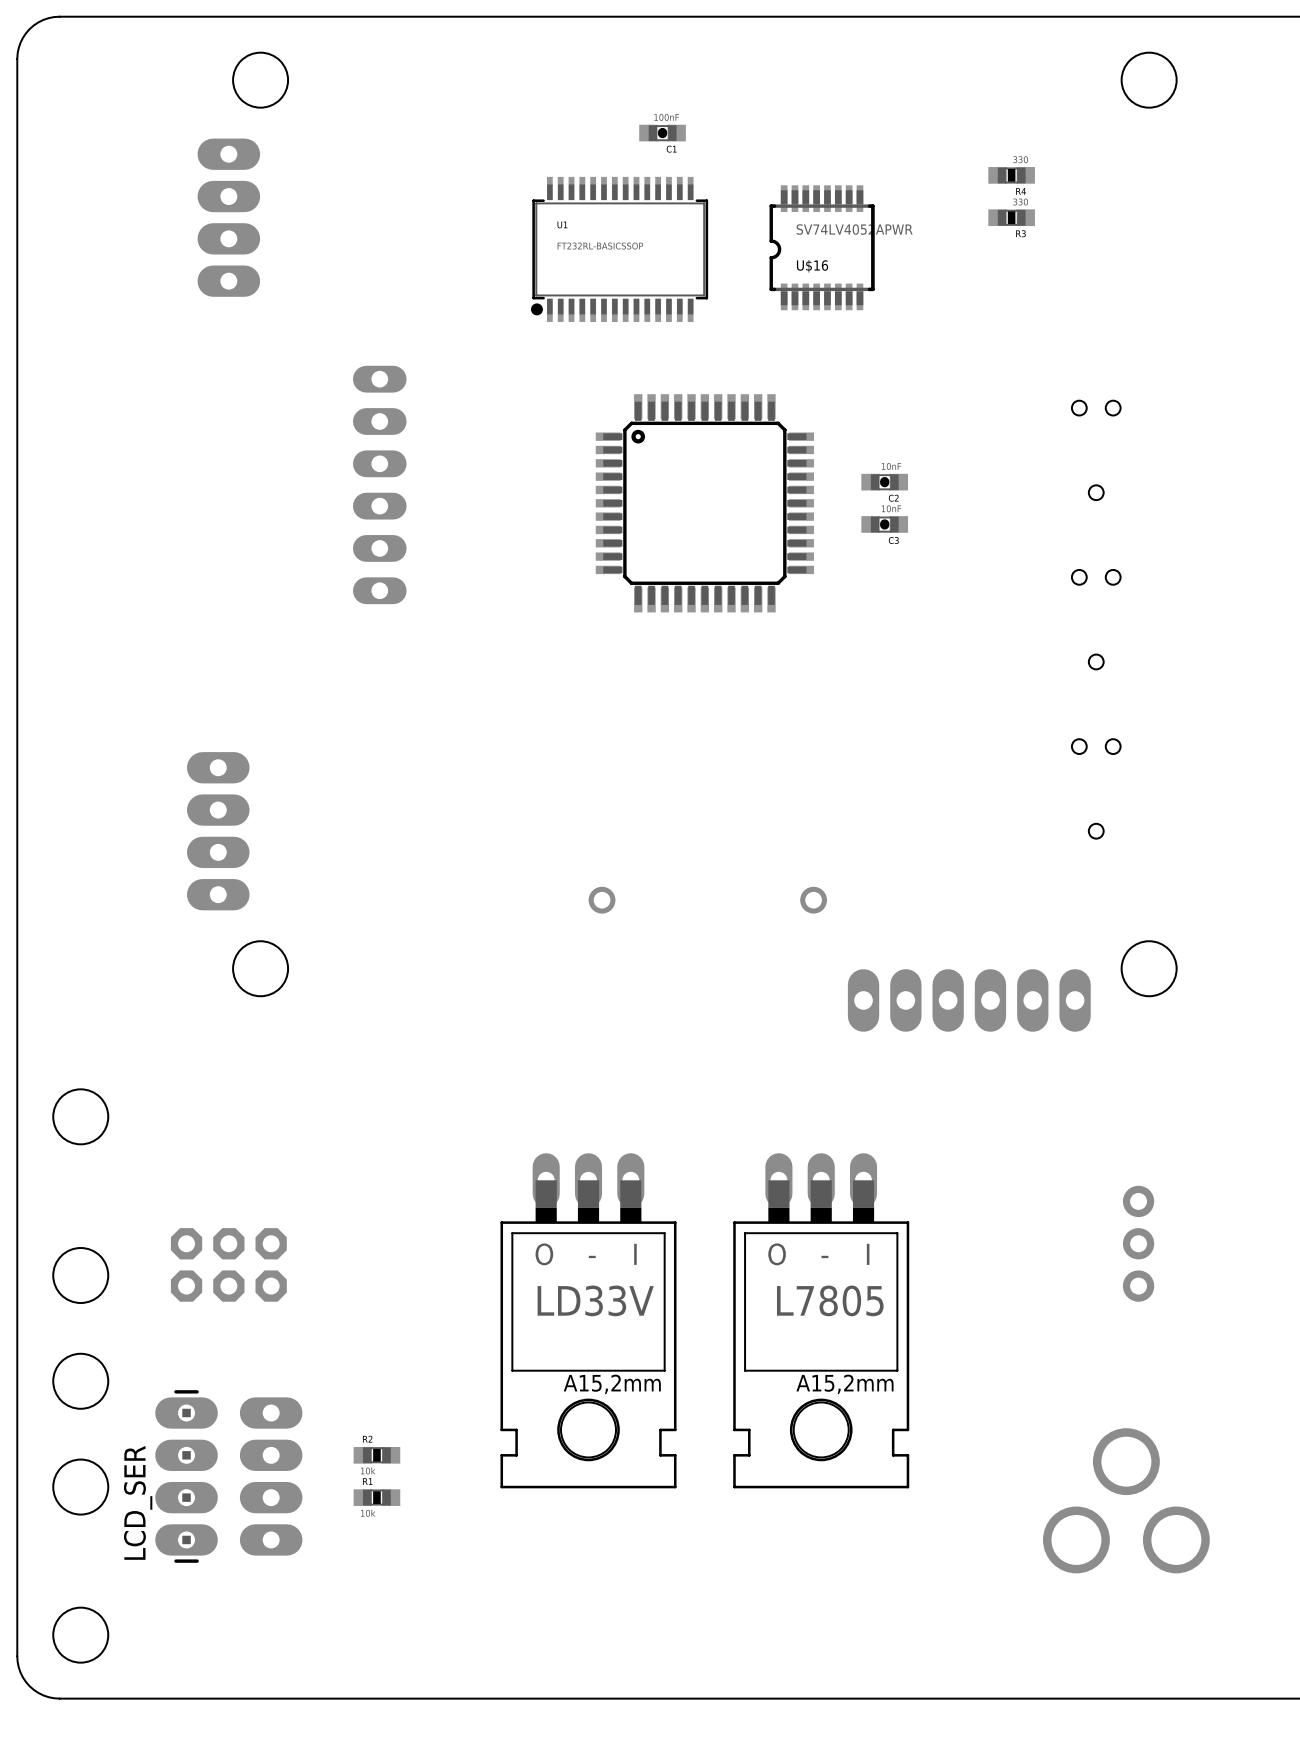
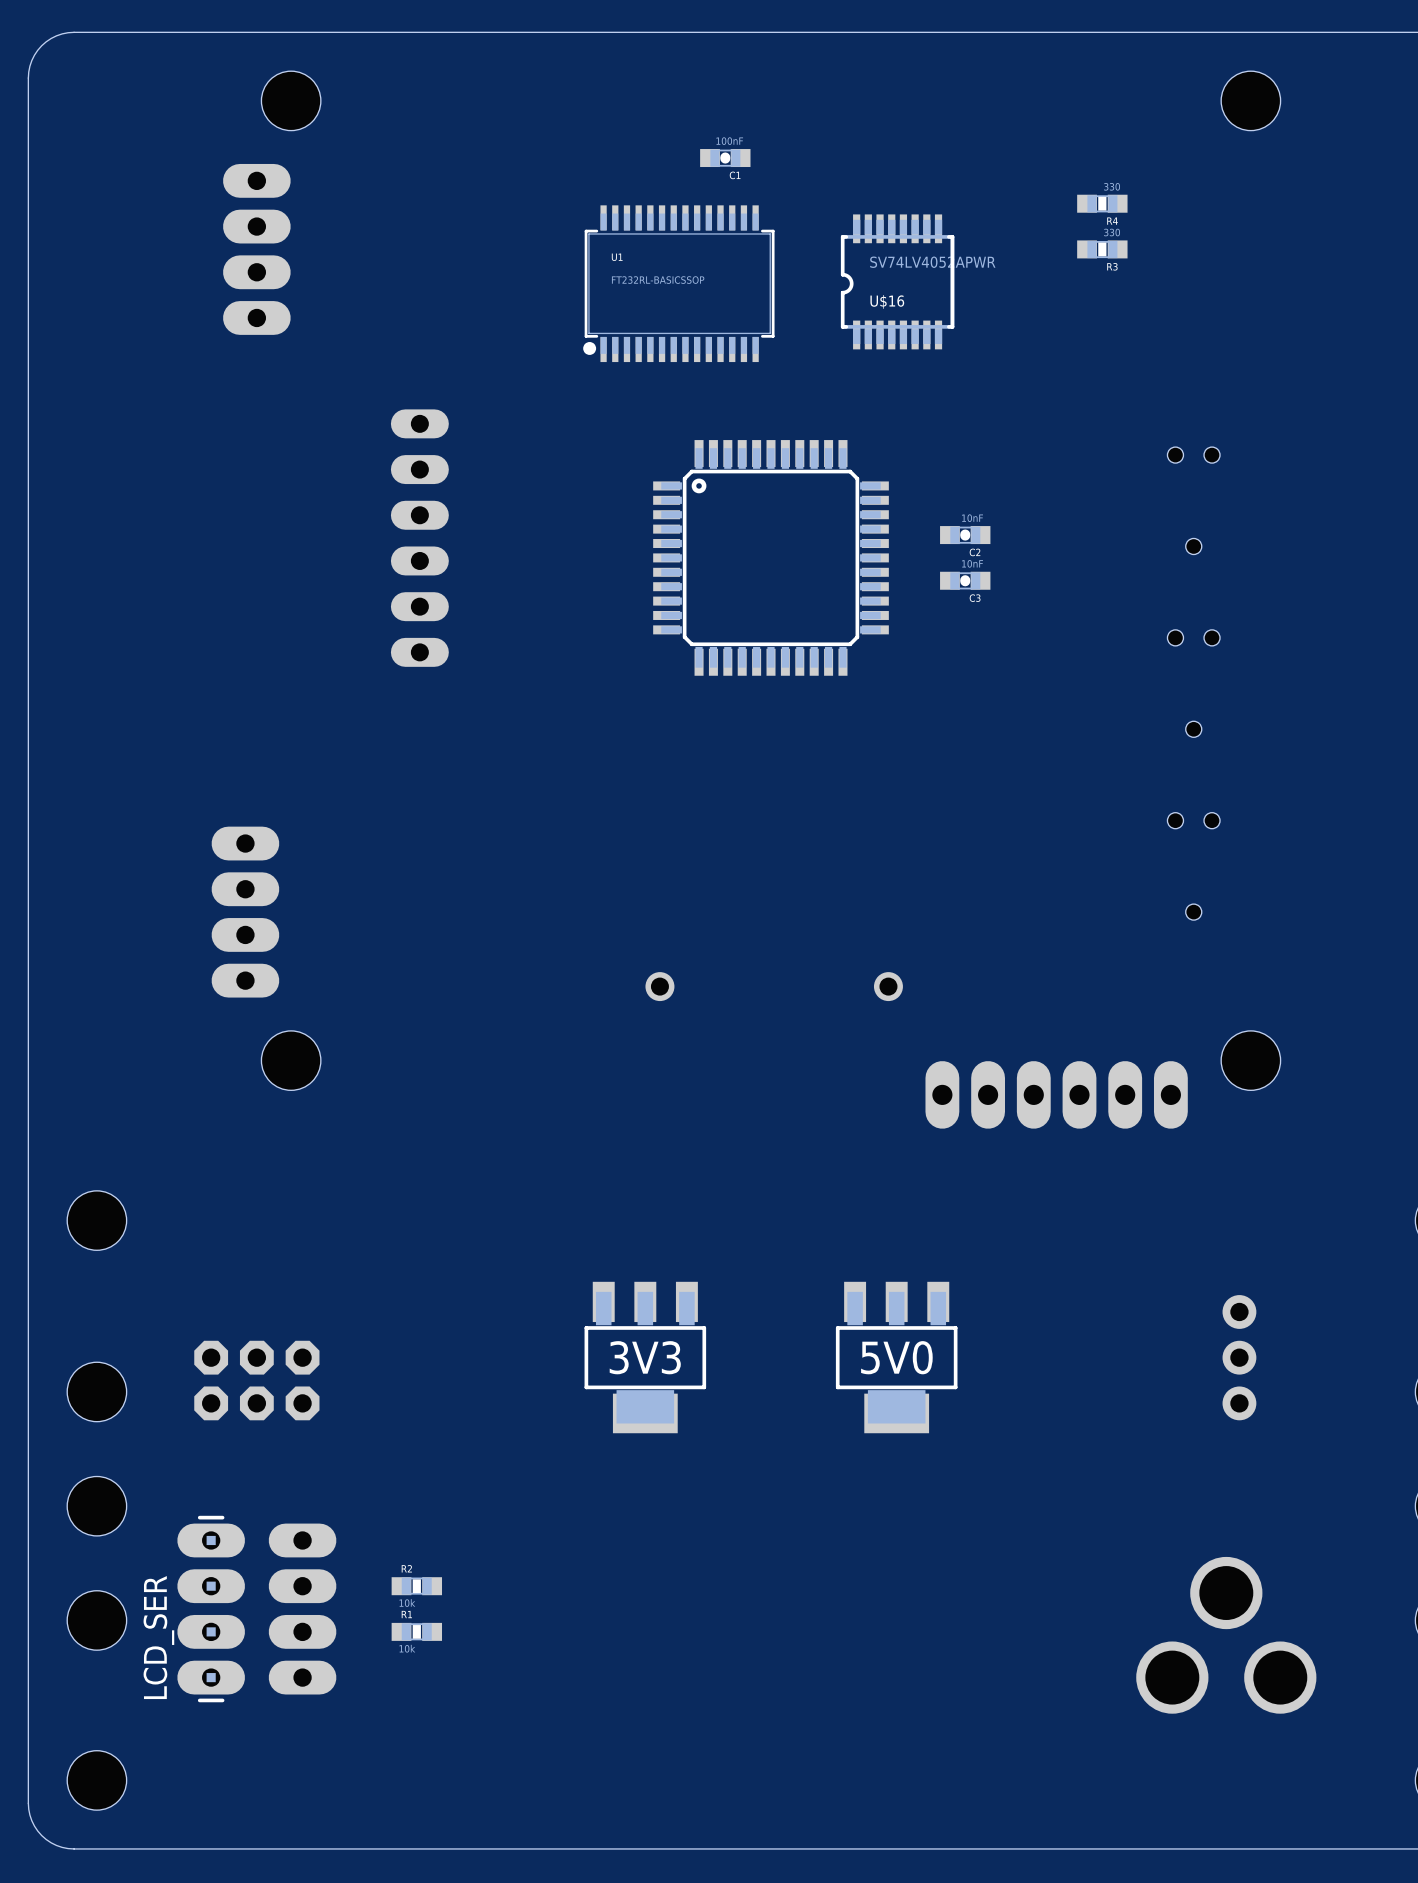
part: none -> (645, 1357)
text: none -> 3V3 (645, 1357)
part: none -> (896, 1357)
text: none -> 5V0 (896, 1357)
part: LD33V (588, 1320) -> none
part: L7805 (821, 1320) -> none

